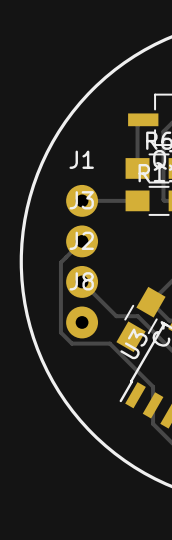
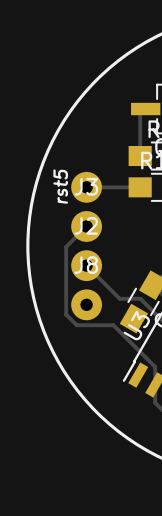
J1 name: J1 (81, 159) -> rst5 (60, 186)

